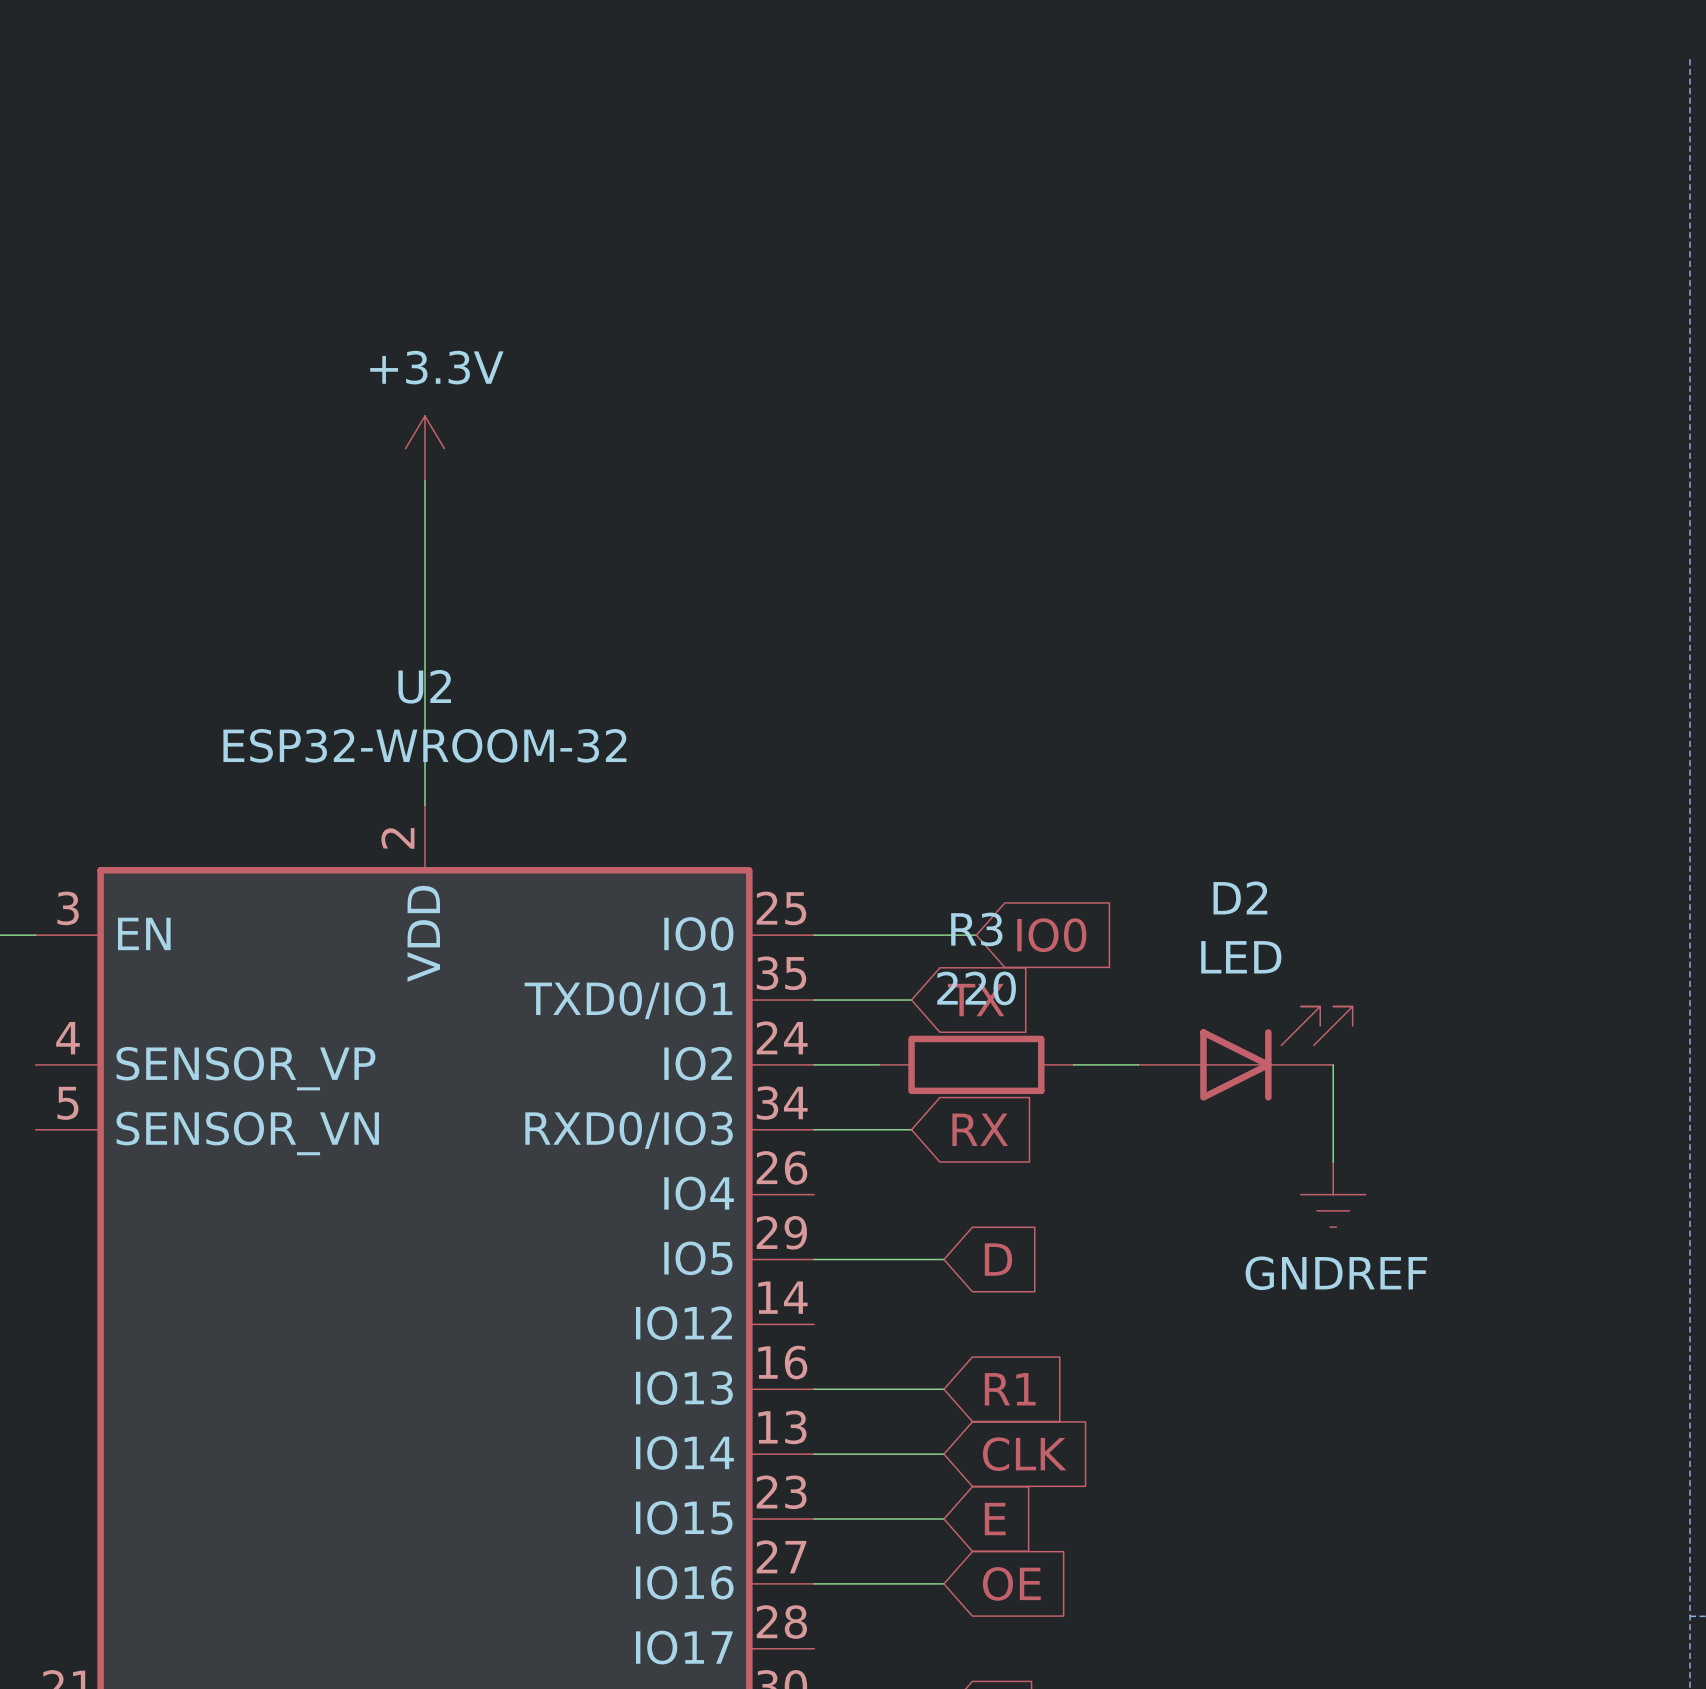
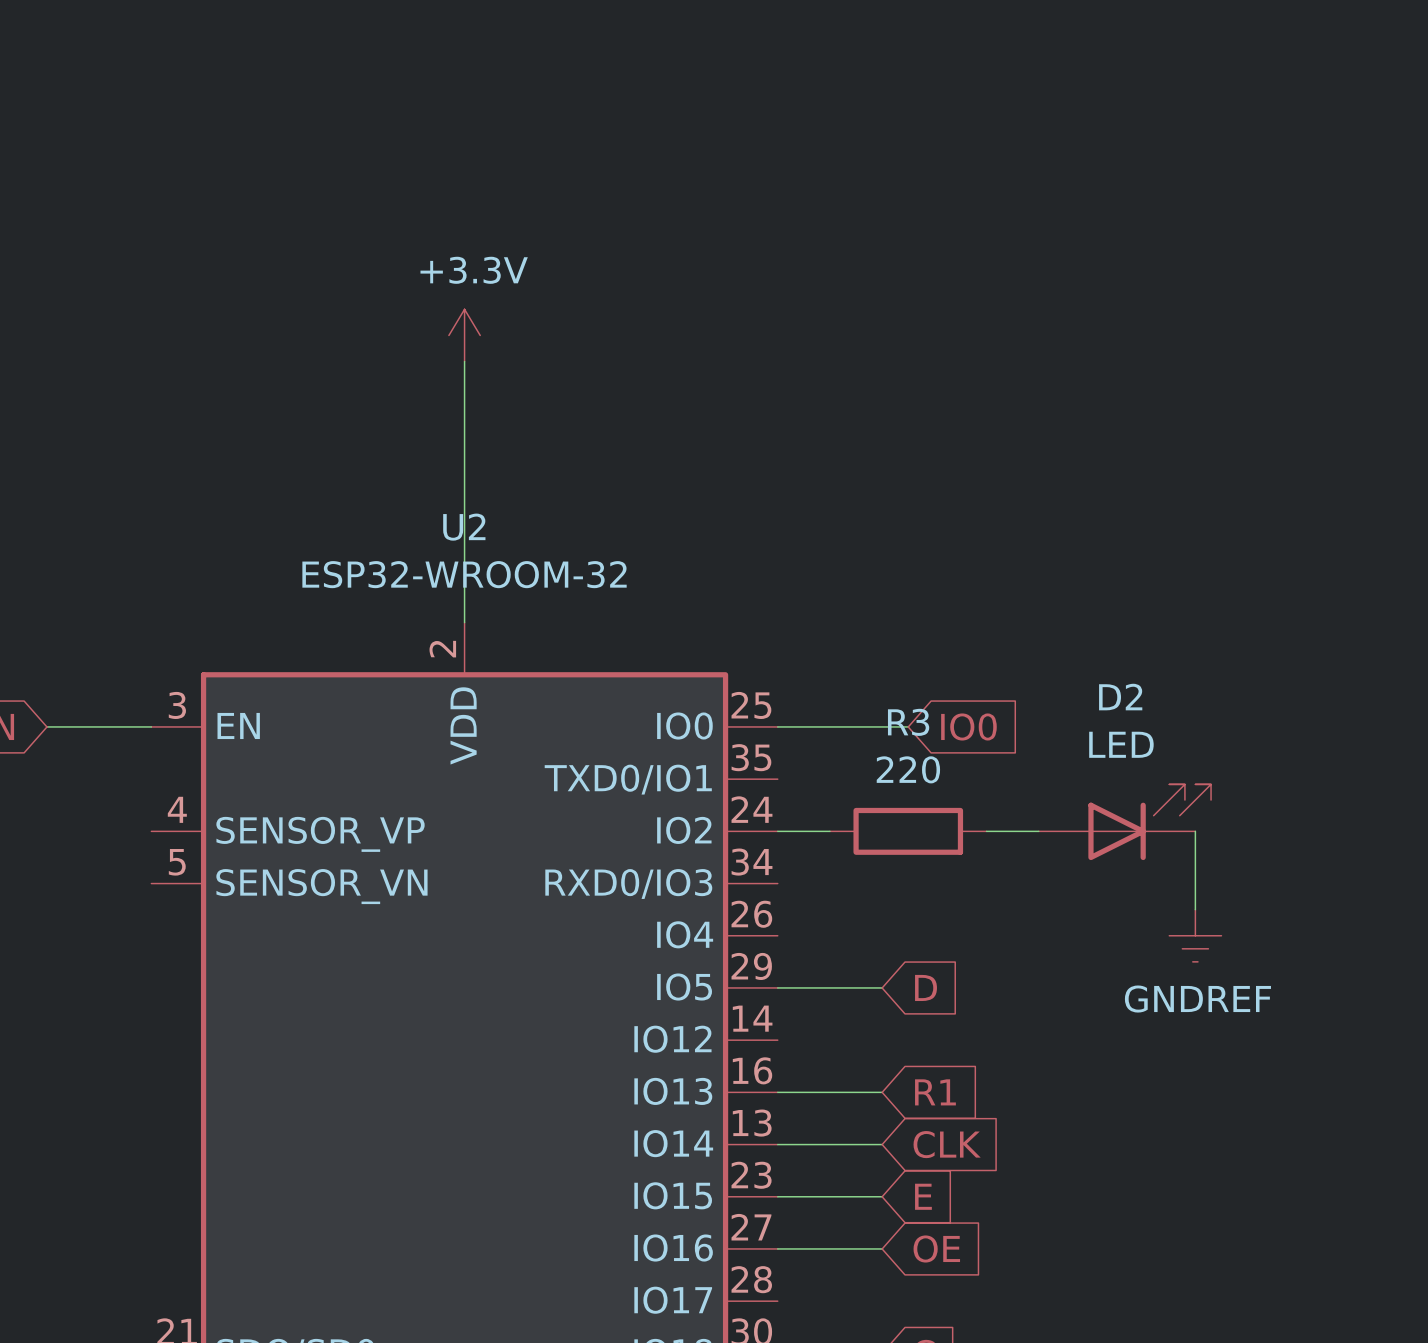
wire: (814, 1000) (911, 1000) -> none
global label: TX (976, 1000) -> none
wire: (814, 1129) (911, 1129) -> none
global label: RX (980, 1129) -> none

